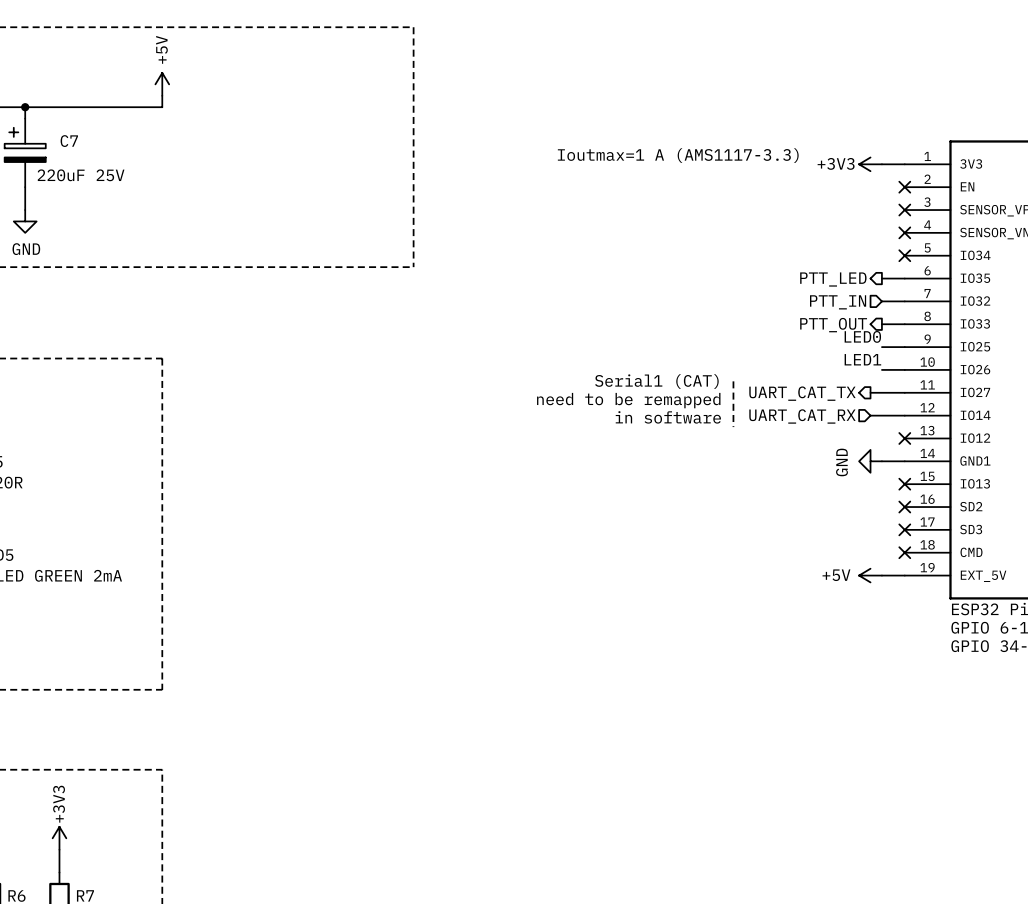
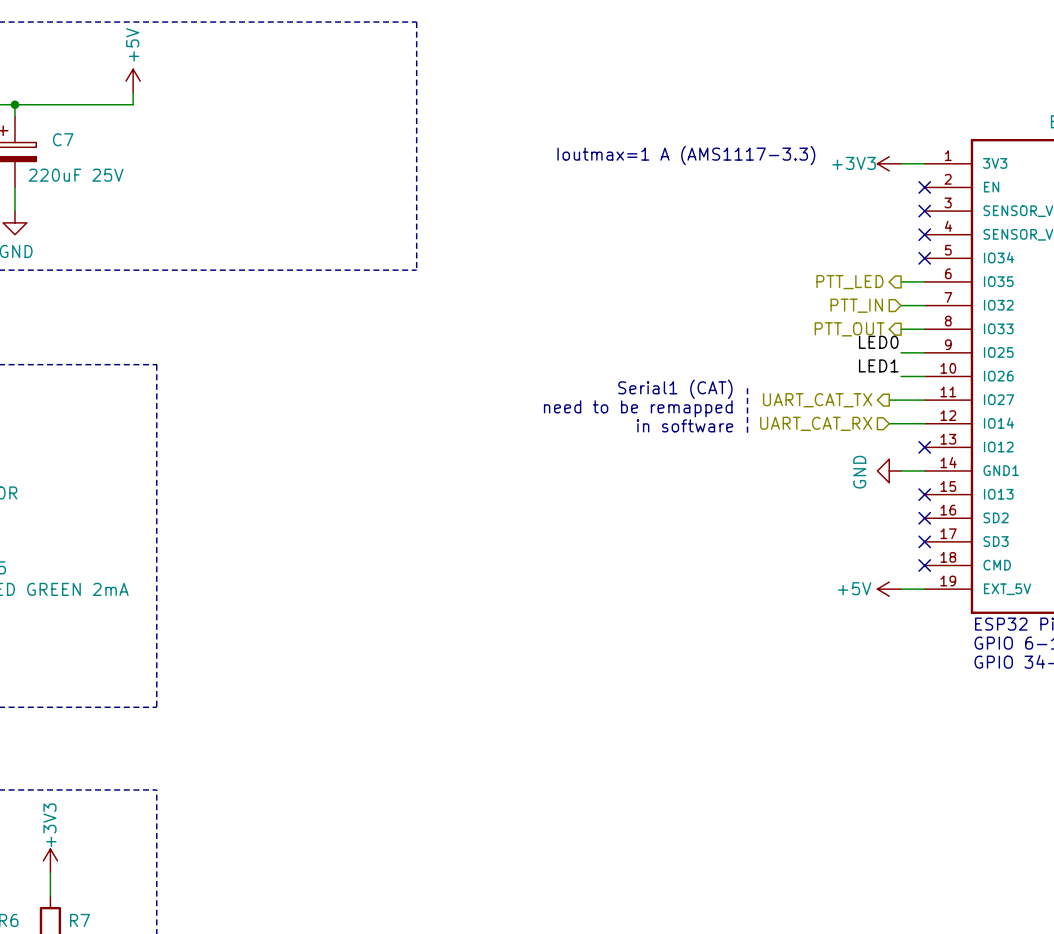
power symbol position: +5V (162, 84) -> +5V (133, 81)
wire: (162, 95) (162, 107) (139, 107) -> (133, 92) (133, 104)

